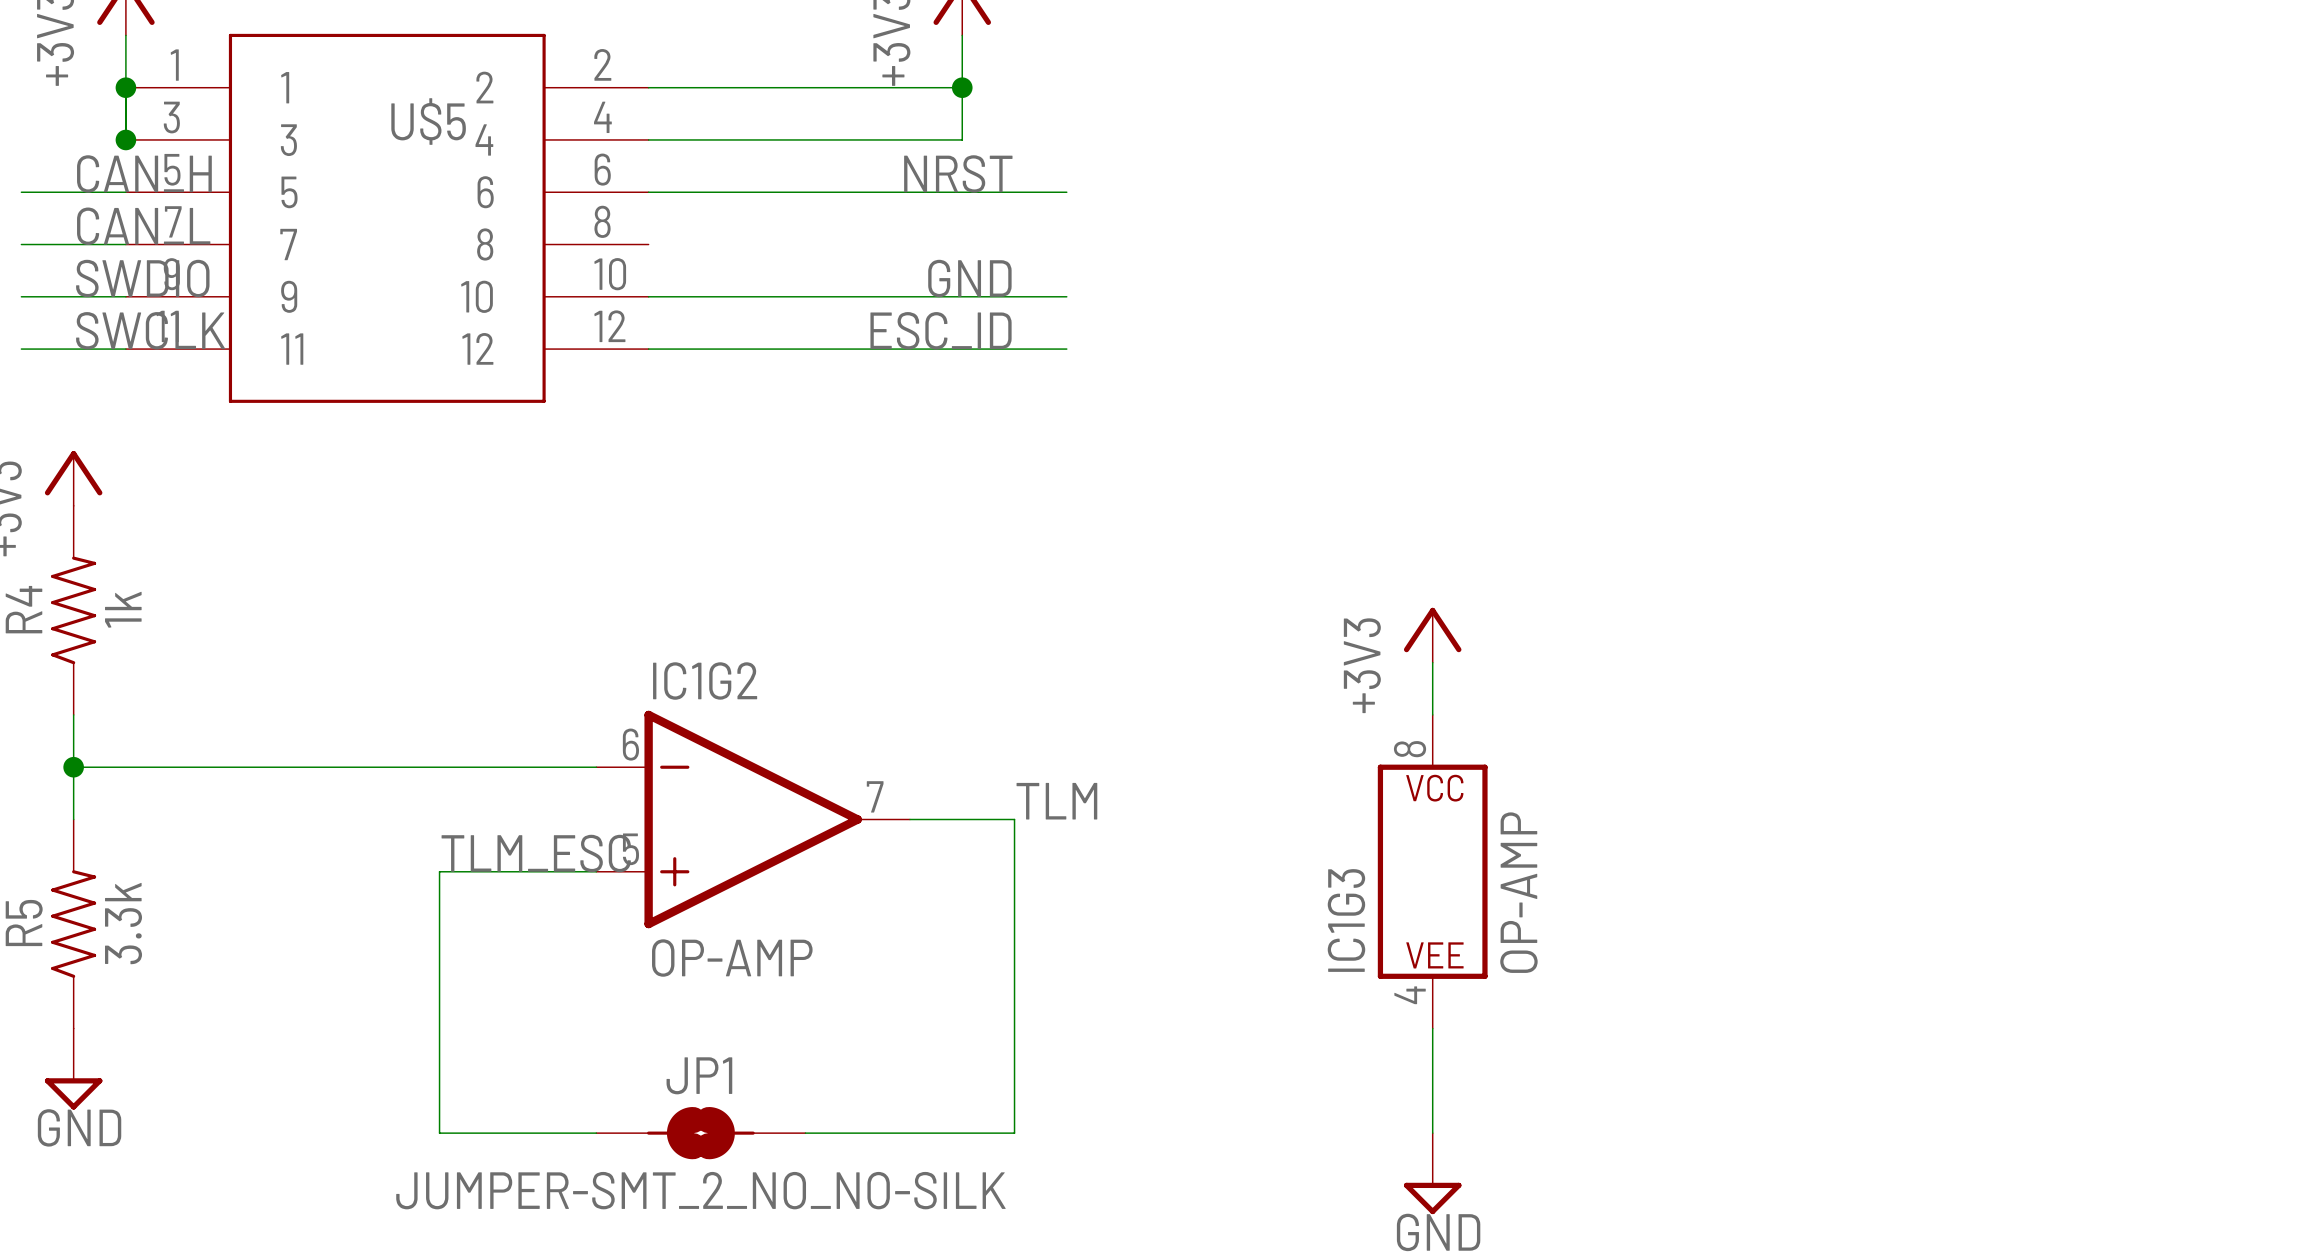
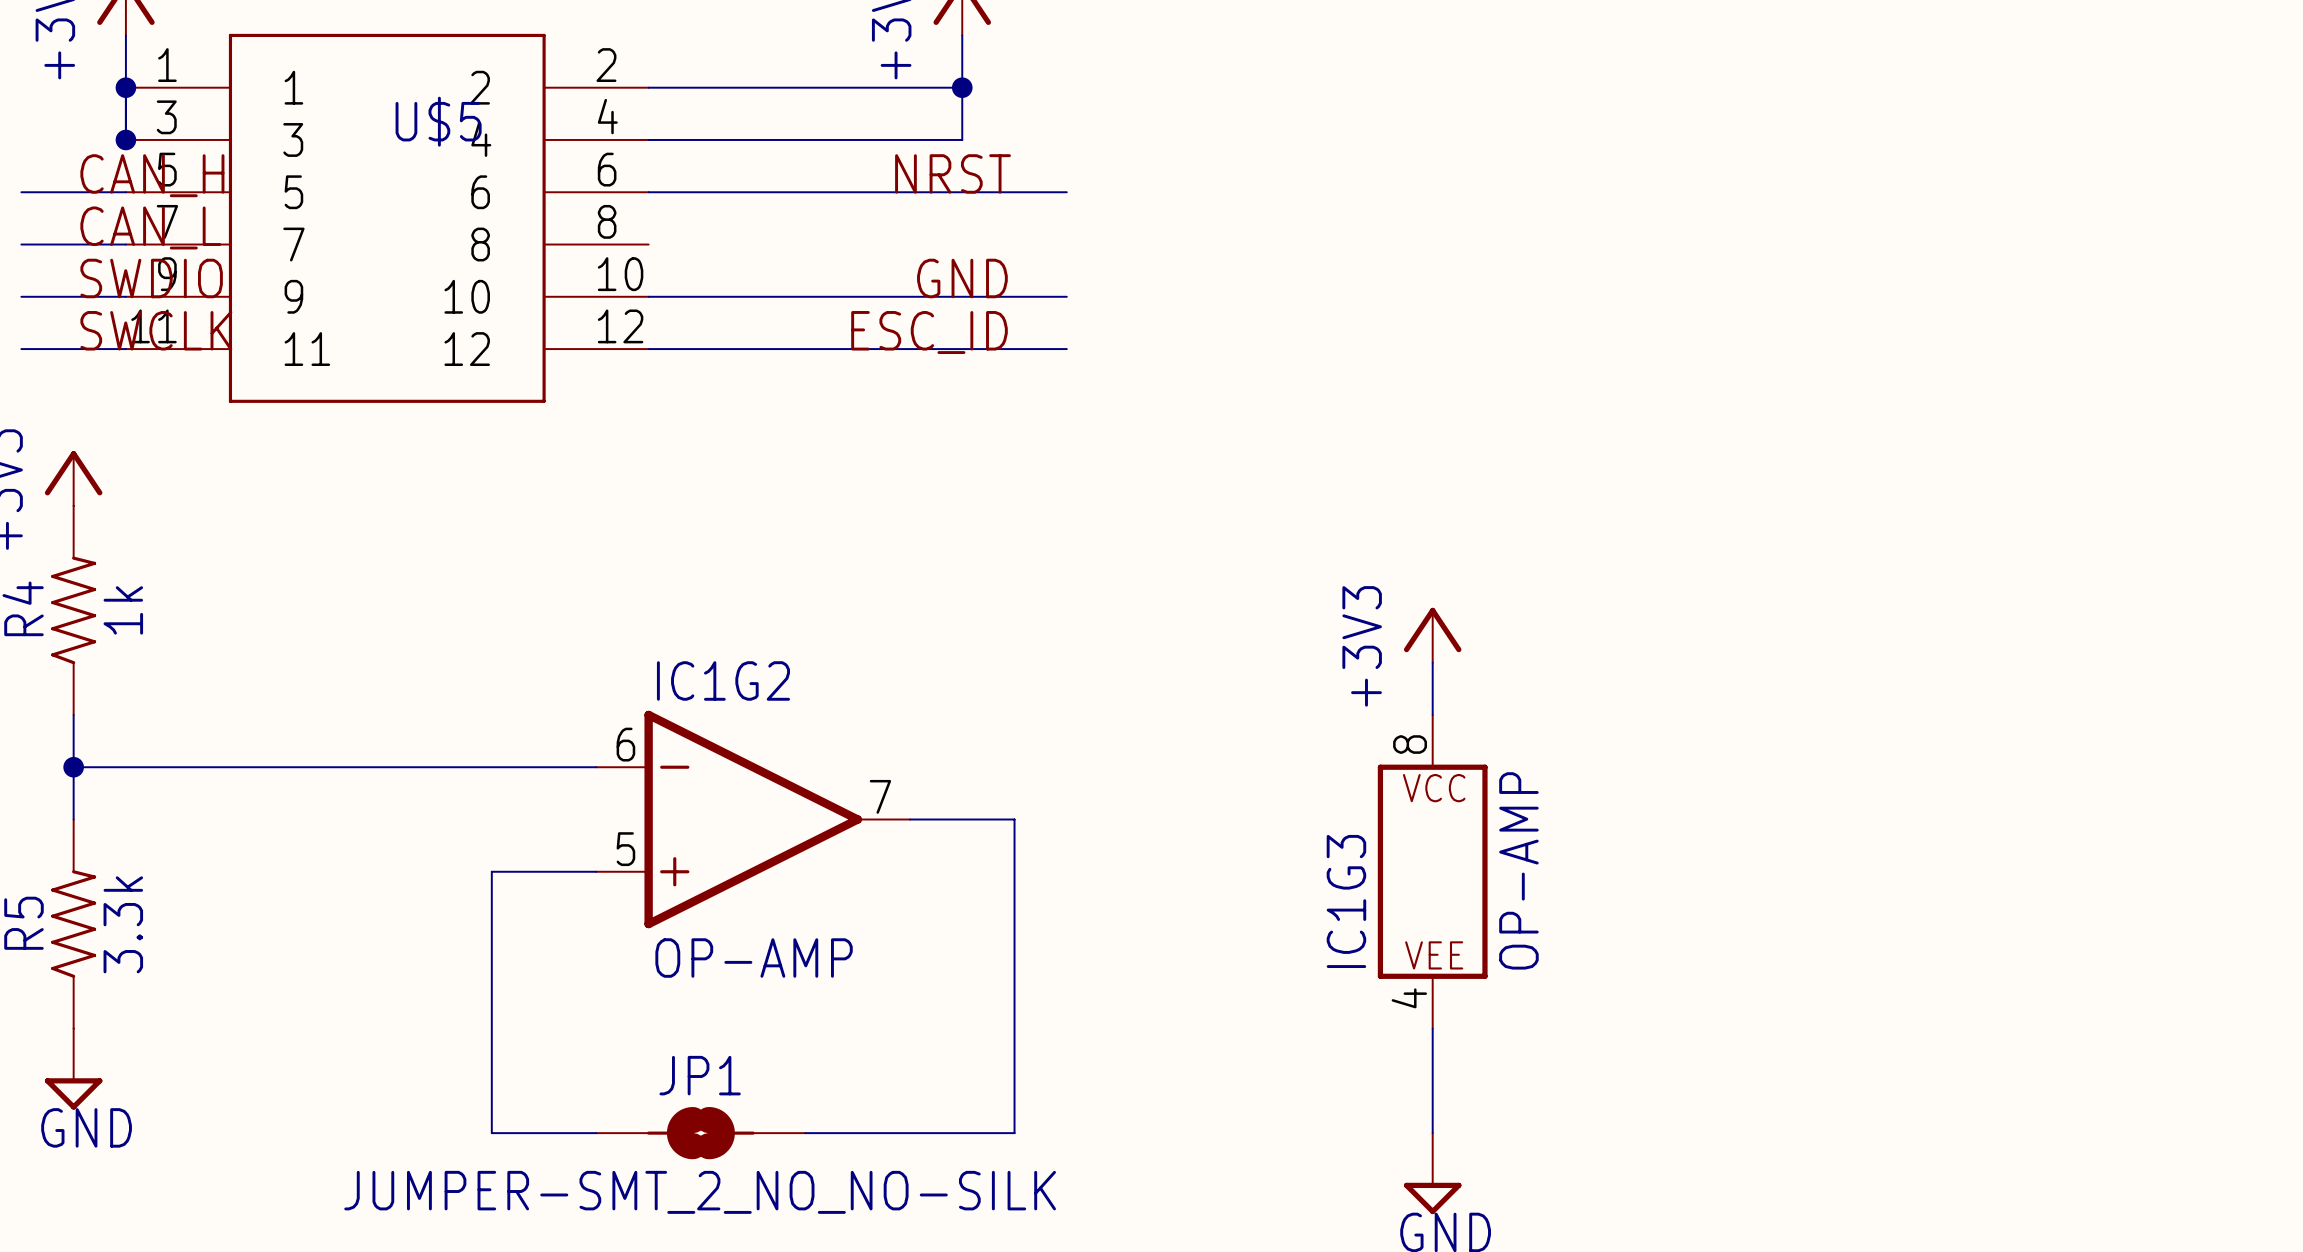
label: TLM (1056, 801) -> none
label: TLM_ESC (536, 853) -> none
wire: (491, 871) (439, 871) (439, 1133) (491, 1133) -> (491, 871) (491, 1133)

